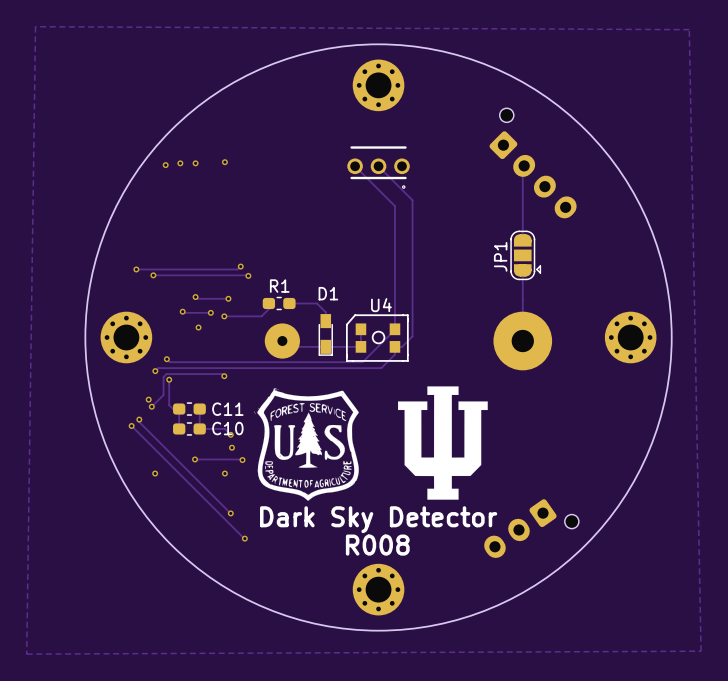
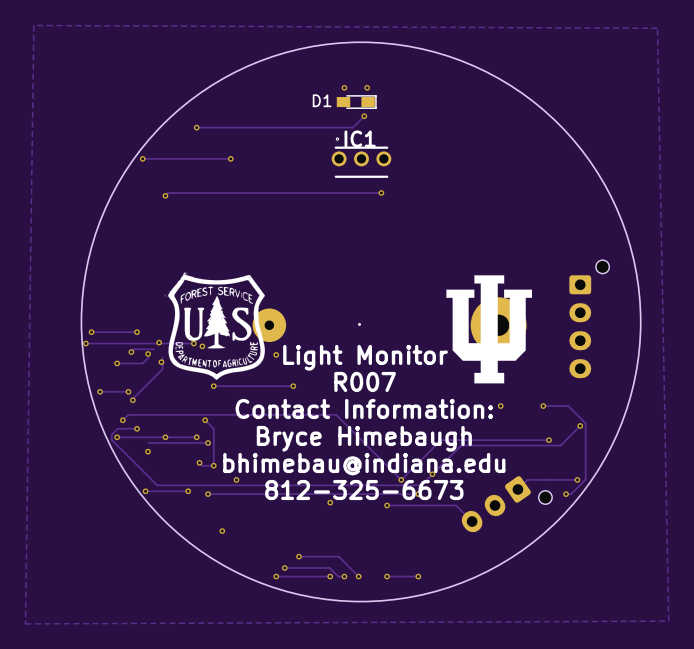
part: (378, 85) -> none
via: none -> (344, 87)
via: none -> (367, 87)
track: none -> (364, 116) (352, 127) (196, 127)
via: none -> (364, 116)
via: none -> (196, 127)
via: (224, 162) -> none
via: (180, 163) -> none
via: (195, 163) -> none
part: (533, 163) -> none
via: (165, 165) -> none
IC1: none -> (361, 157)
track: (524, 165) (522, 240) -> none
track: none -> (142, 158) (230, 158)
via: none -> (142, 158)
via: none -> (230, 158)
track: (355, 166) (394, 206) (394, 329) (362, 362) (169, 362) (166, 359) -> none
track: (378, 166) (412, 200) (412, 336) (402, 346) (394, 346) (394, 354) (381, 368) (158, 368) (155, 371) -> none
part: (378, 167) -> none
track: none -> (381, 192) (168, 192) (165, 195)
via: none -> (381, 192)
via: none -> (165, 195)
JP1: (525, 255) -> none
track: (240, 266) (237, 269) (136, 269) -> none
via: (240, 266) -> none
via: (136, 269) -> none
track: (522, 270) (522, 341) -> none
track: (153, 275) (248, 275) -> none
via: (153, 275) -> none
via: (248, 275) -> none
track: (195, 297) (197, 298) (228, 298) -> none
via: (195, 297) -> none
via: (228, 298) -> none
track: (268, 303) (268, 309) (261, 316) (224, 316) -> none
R1: (279, 303) -> none
track: (289, 303) (317, 303) (325, 312) (325, 321) -> none
track: (182, 311) (210, 312) -> none
via: (182, 311) -> none
via: (210, 312) -> none
via: (224, 316) -> none
via: (198, 327) -> none
track: (360, 329) (360, 346) (288, 346) (282, 341) -> none
drawing shape: [371, 330, 386, 345] -> [358, 323, 361, 326]
D1 rotation: 0° (325, 334) -> 90° counterclockwise (356, 102)
D1 position: (325, 334) -> (356, 102)
part: none -> (589, 319)
part: (126, 337) -> none
part: (630, 337) -> none
U4: (377, 338) -> none
track: none -> (91, 332) (137, 332)
via: none -> (91, 332)
via: none -> (137, 332)
track: none -> (85, 343) (193, 343)
via: none -> (85, 343)
via: none -> (193, 343)
via: none -> (202, 346)
track: none -> (154, 349) (134, 349) (131, 352)
via: none -> (131, 352)
via: none -> (276, 354)
track: none -> (148, 357) (142, 363) (117, 363)
track: none -> (162, 357) (162, 369) (131, 400)
text: none -> Light Monitor (365, 357)
track: (224, 376) (222, 374) (166, 374) (163, 377) (163, 395) (151, 406) -> none
via: (224, 376) -> none
track: (169, 379) (169, 405) (173, 409) (179, 409) (179, 428) -> none
via: none -> (117, 363)
via: (148, 399) -> none
text: none -> R007 (365, 381)
track: none -> (213, 386) (293, 386)
via: none -> (213, 386)
via: none -> (293, 386)
via: (151, 406) -> none
C11: (189, 409) -> none
track: (199, 409) (199, 428) (224, 428) (230, 434) -> none
track: none -> (100, 391) (128, 391)
via: none -> (100, 391)
via: none -> (128, 391)
track: (139, 419) (139, 422) (230, 513) -> none
track: (131, 425) (244, 538) -> none
via: (131, 425) -> none
via: none -> (500, 406)
track: none -> (543, 406) (568, 406) (585, 423) (585, 479) (571, 494) (566, 494)
via: none -> (543, 406)
C10: (189, 428) -> none
text: none -> Contact Information: (364, 408)
via: (230, 434) -> none
track: none -> (122, 420) (128, 414) (336, 414) (401, 479) (441, 440) (549, 440)
via: none -> (122, 420)
track: none -> (205, 420) (213, 428) (213, 465) (202, 465) (199, 462)
via: none -> (205, 420)
drawing position: (442, 443) -> (489, 329)
drawing position: (306, 444) -> (214, 326)
track: none -> (580, 425) (560, 445) (461, 445) (421, 485) (157, 485) (111, 439) (111, 434) (117, 428) (137, 428)
via: none -> (580, 425)
via: (231, 447) -> none
via: none -> (137, 428)
track: none -> (117, 437) (196, 437)
via: none -> (117, 437)
via: none -> (165, 437)
via: none -> (196, 437)
track: (195, 459) (242, 460) -> none
via: (195, 459) -> none
via: (242, 460) -> none
text: none -> Bryce Himebaugh (364, 438)
via: none -> (549, 440)
track: none -> (148, 442) (208, 442)
via: none -> (208, 442)
via: (224, 473) -> none
via: none -> (199, 462)
text: none -> bhimebau@indiana.edu (364, 464)
via: none -> (213, 465)
via: none -> (432, 474)
via: none -> (236, 479)
via: none -> (401, 479)
track: none -> (577, 479) (527, 479) (517, 489)
via: none -> (577, 479)
via: (230, 513) -> none
track: none -> (145, 491) (188, 491)
via: none -> (145, 491)
via: none -> (188, 491)
track: none -> (208, 494) (418, 494)
via: none -> (208, 494)
via: none -> (418, 494)
via: none -> (566, 494)
text: Dark Sky Detector (378, 519) -> 812-325-6673 (364, 490)
via: none -> (330, 502)
track: none -> (387, 505) (456, 505) (472, 521)
via: none -> (387, 505)
via: (244, 538) -> none
text: R008 (377, 545) -> none
via: none -> (222, 531)
track: none -> (298, 556) (338, 556) (358, 576)
via: none -> (298, 556)
part: (378, 589) -> none
track: none -> (284, 568) (329, 568) (338, 576) (344, 576)
via: none -> (284, 568)
track: none -> (276, 576) (330, 576)
via: none -> (276, 576)
via: none -> (330, 576)
via: none -> (344, 576)
via: none -> (358, 576)
track: none -> (387, 576) (418, 576)
via: none -> (387, 576)
via: none -> (418, 576)

